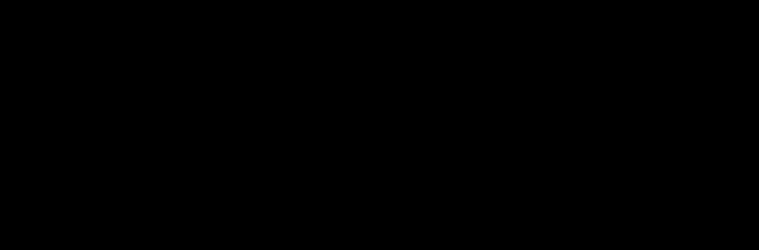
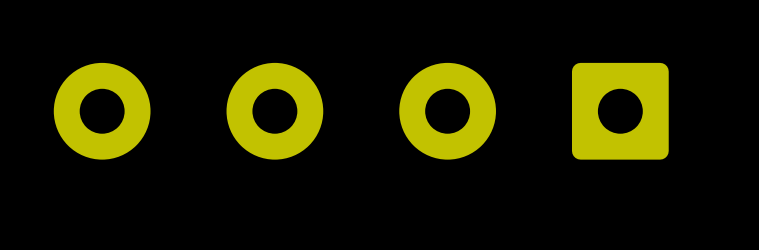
part: none -> (361, 111)

